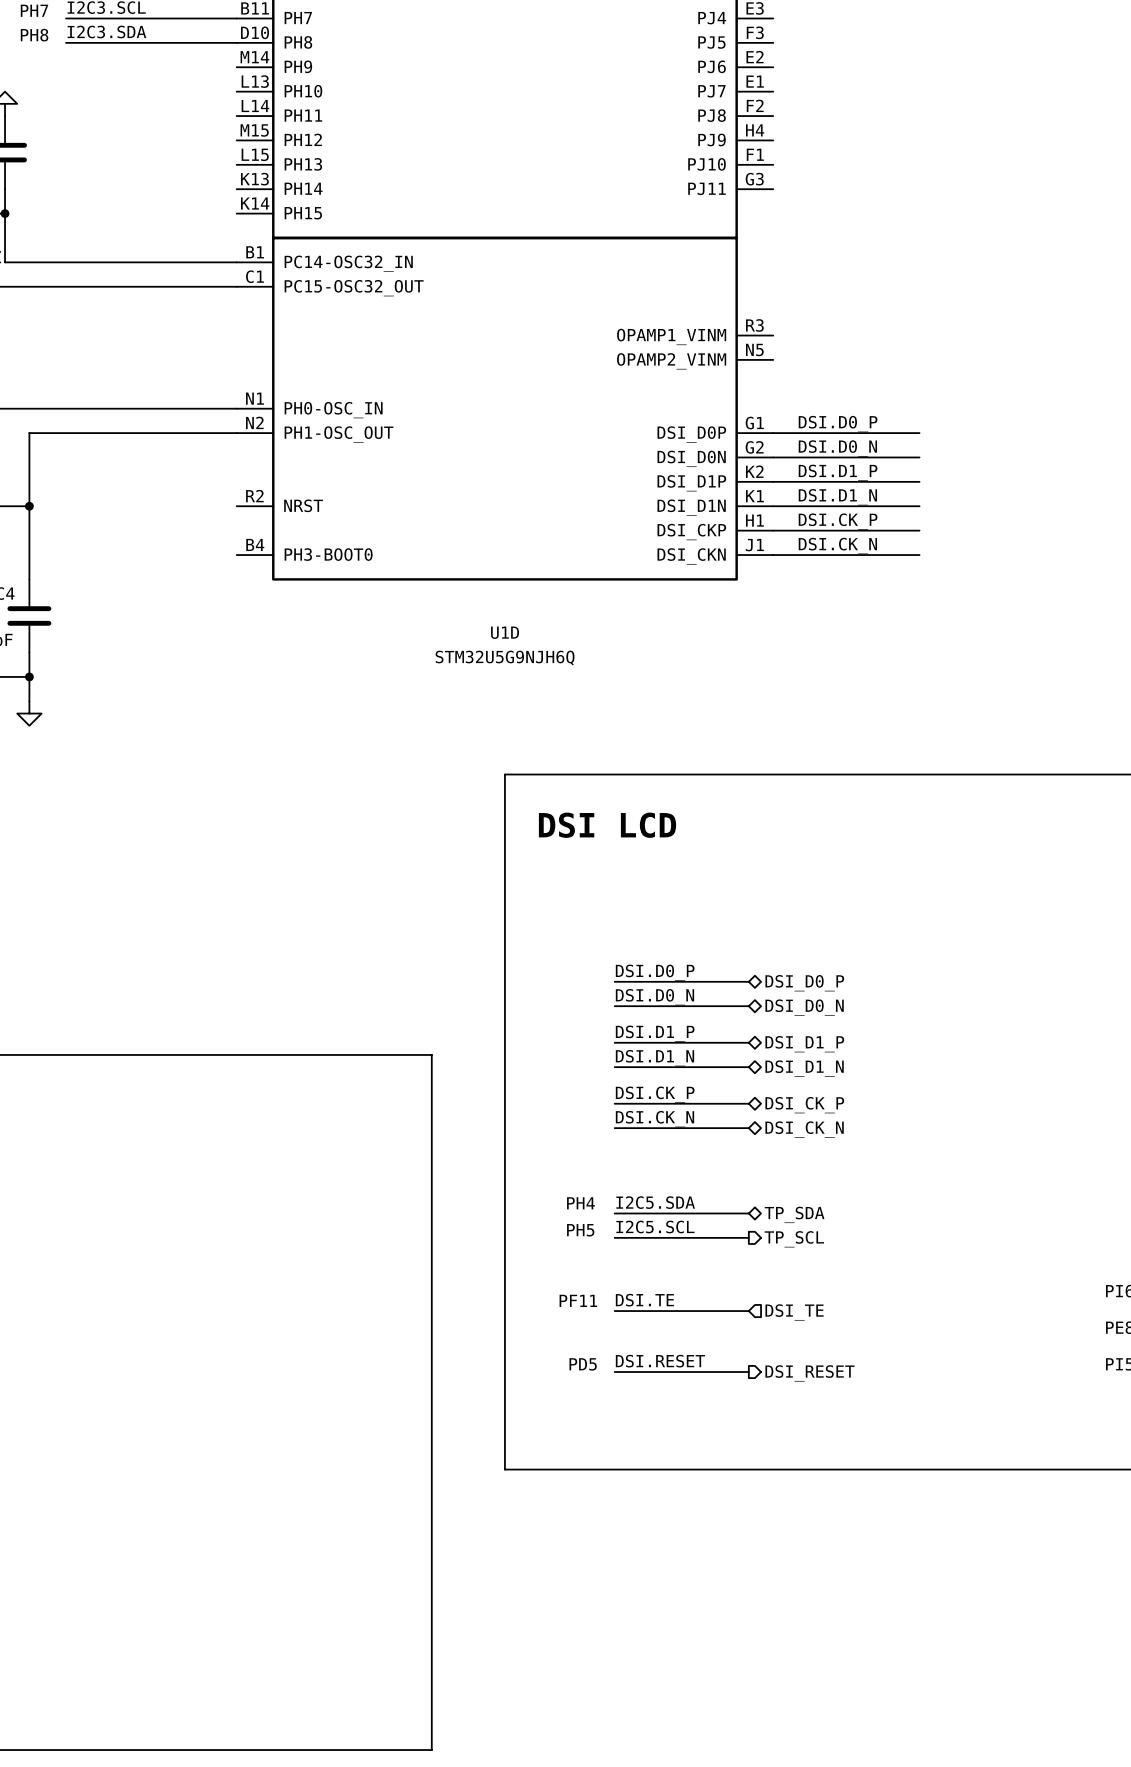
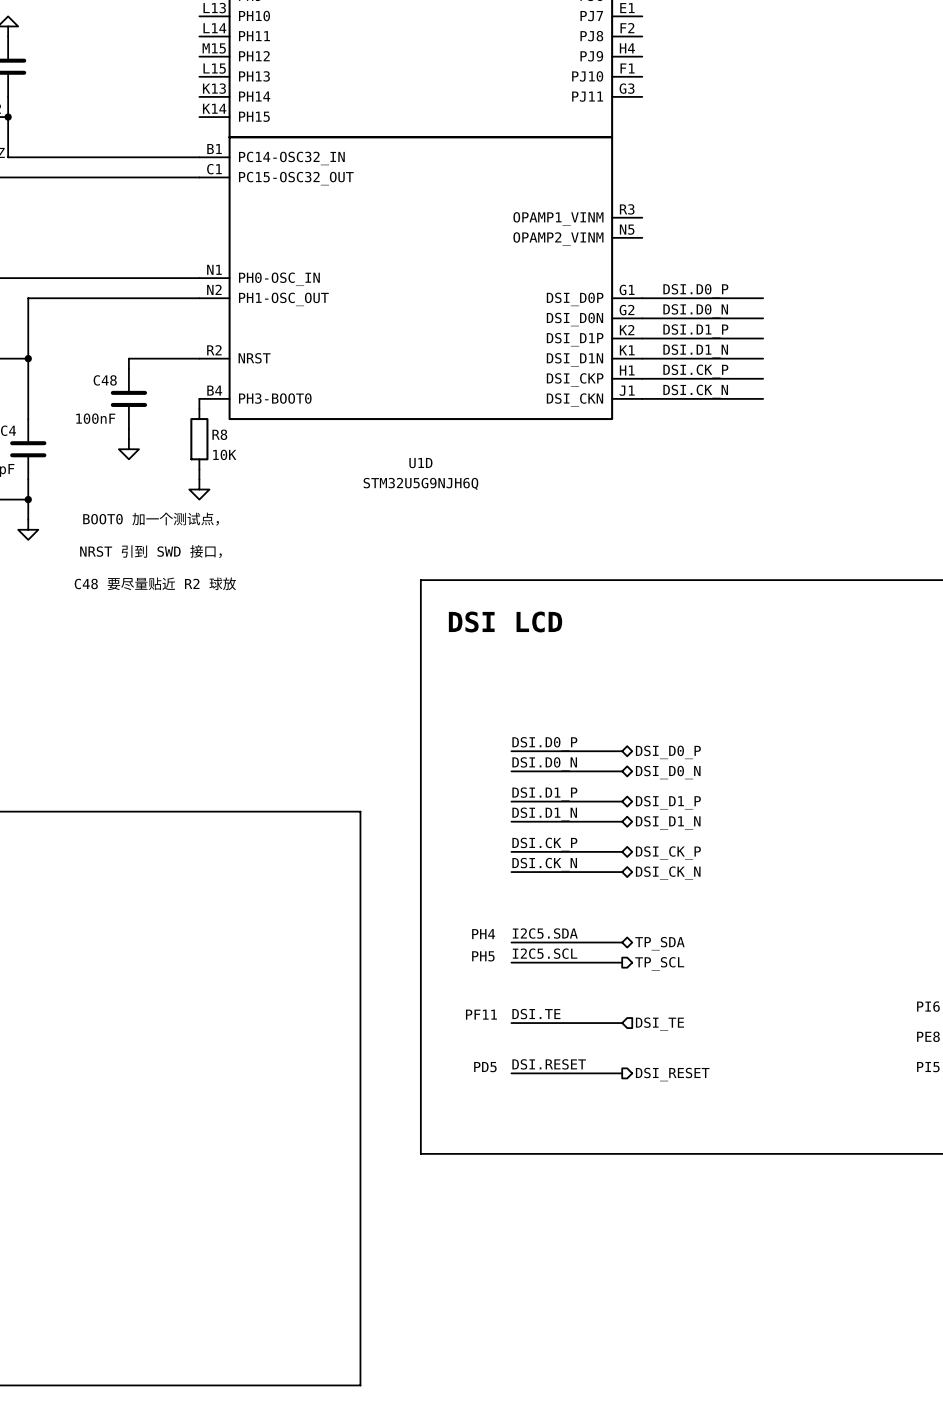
wire: none -> (199, 358) (128, 358) (128, 368)
C48: none -> 100nF (128, 398)
wire: none -> (199, 398) (199, 408)
wire: none -> (128, 429) (128, 439)
R8: none -> 10K (199, 439)
power symbol: none -> (128, 449)
wire: none -> (199, 469) (199, 479)
power symbol: none -> (199, 489)
text: none -> BOOT0 加一个测试点， (151, 519)
text: none -> NRST 引到 SWD 接口， (150, 551)
text: none -> C48 要尽量贴近 R2 球放 (155, 583)

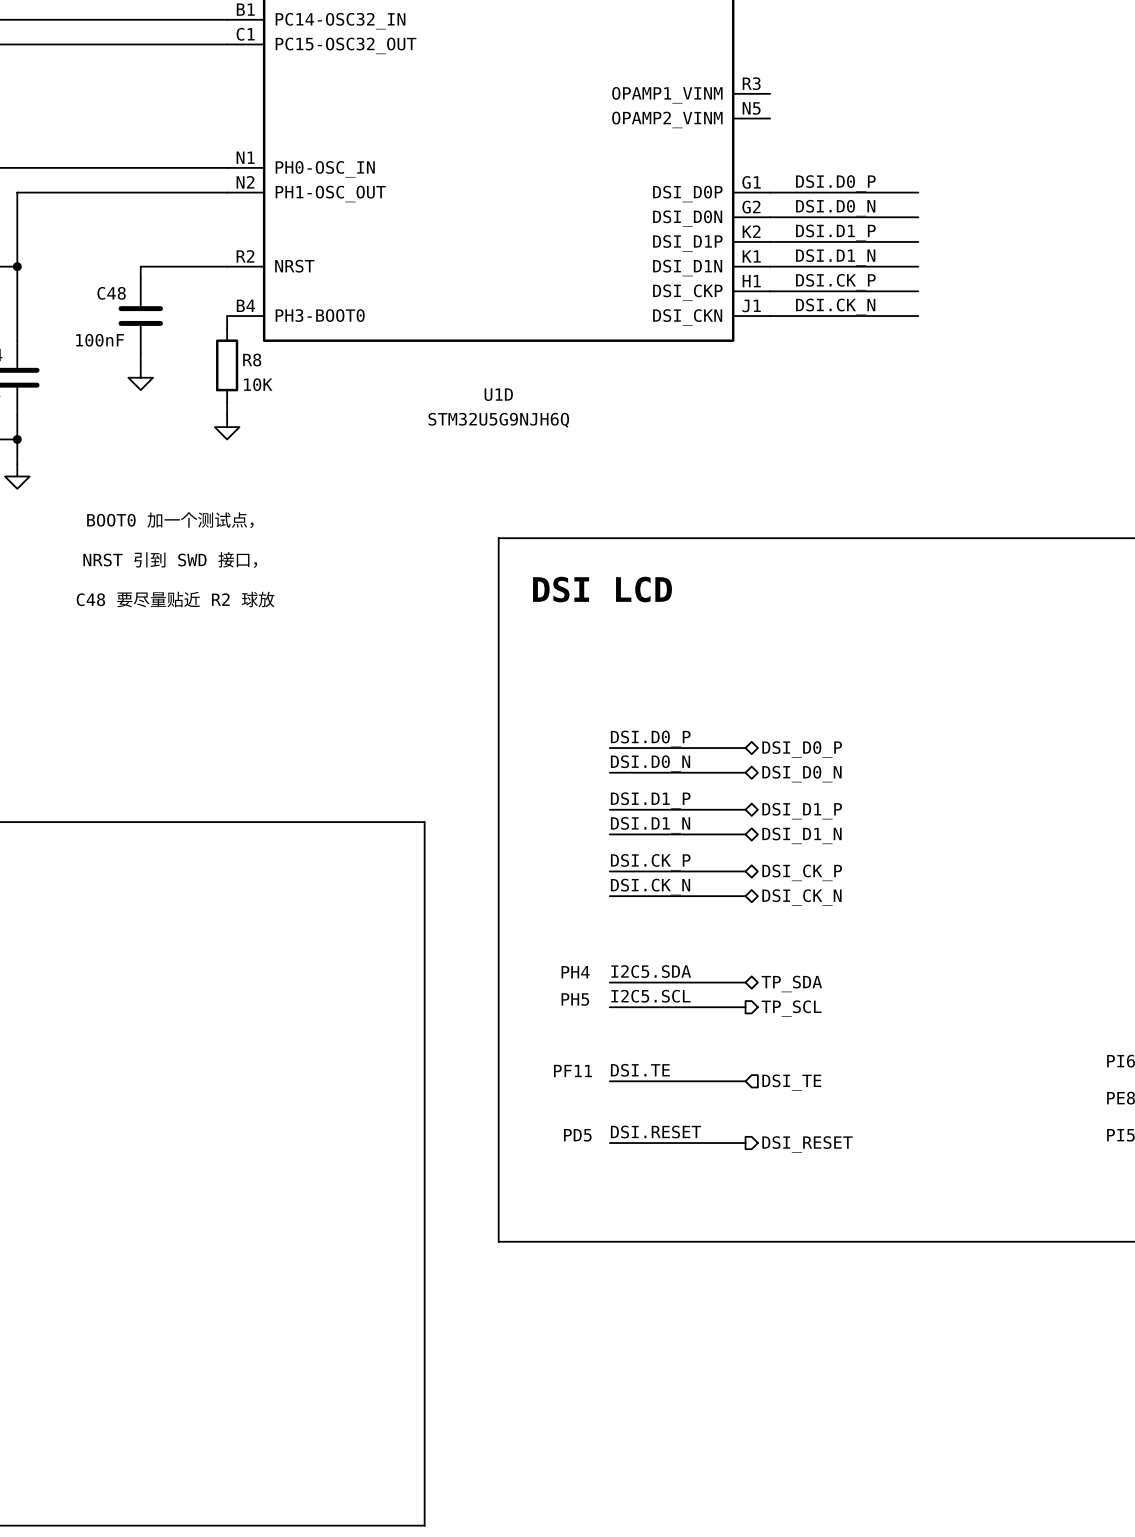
text position: BOOT0 加一个测试点， (151, 519) -> BOOT0 加一个测试点， (170, 520)
text position: NRST 引到 SWD 接口， (150, 551) -> NRST 引到 SWD 接口， (170, 559)
text position: C48 要尽量贴近 R2 球放 (155, 583) -> C48 要尽量贴近 R2 球放 (175, 599)

